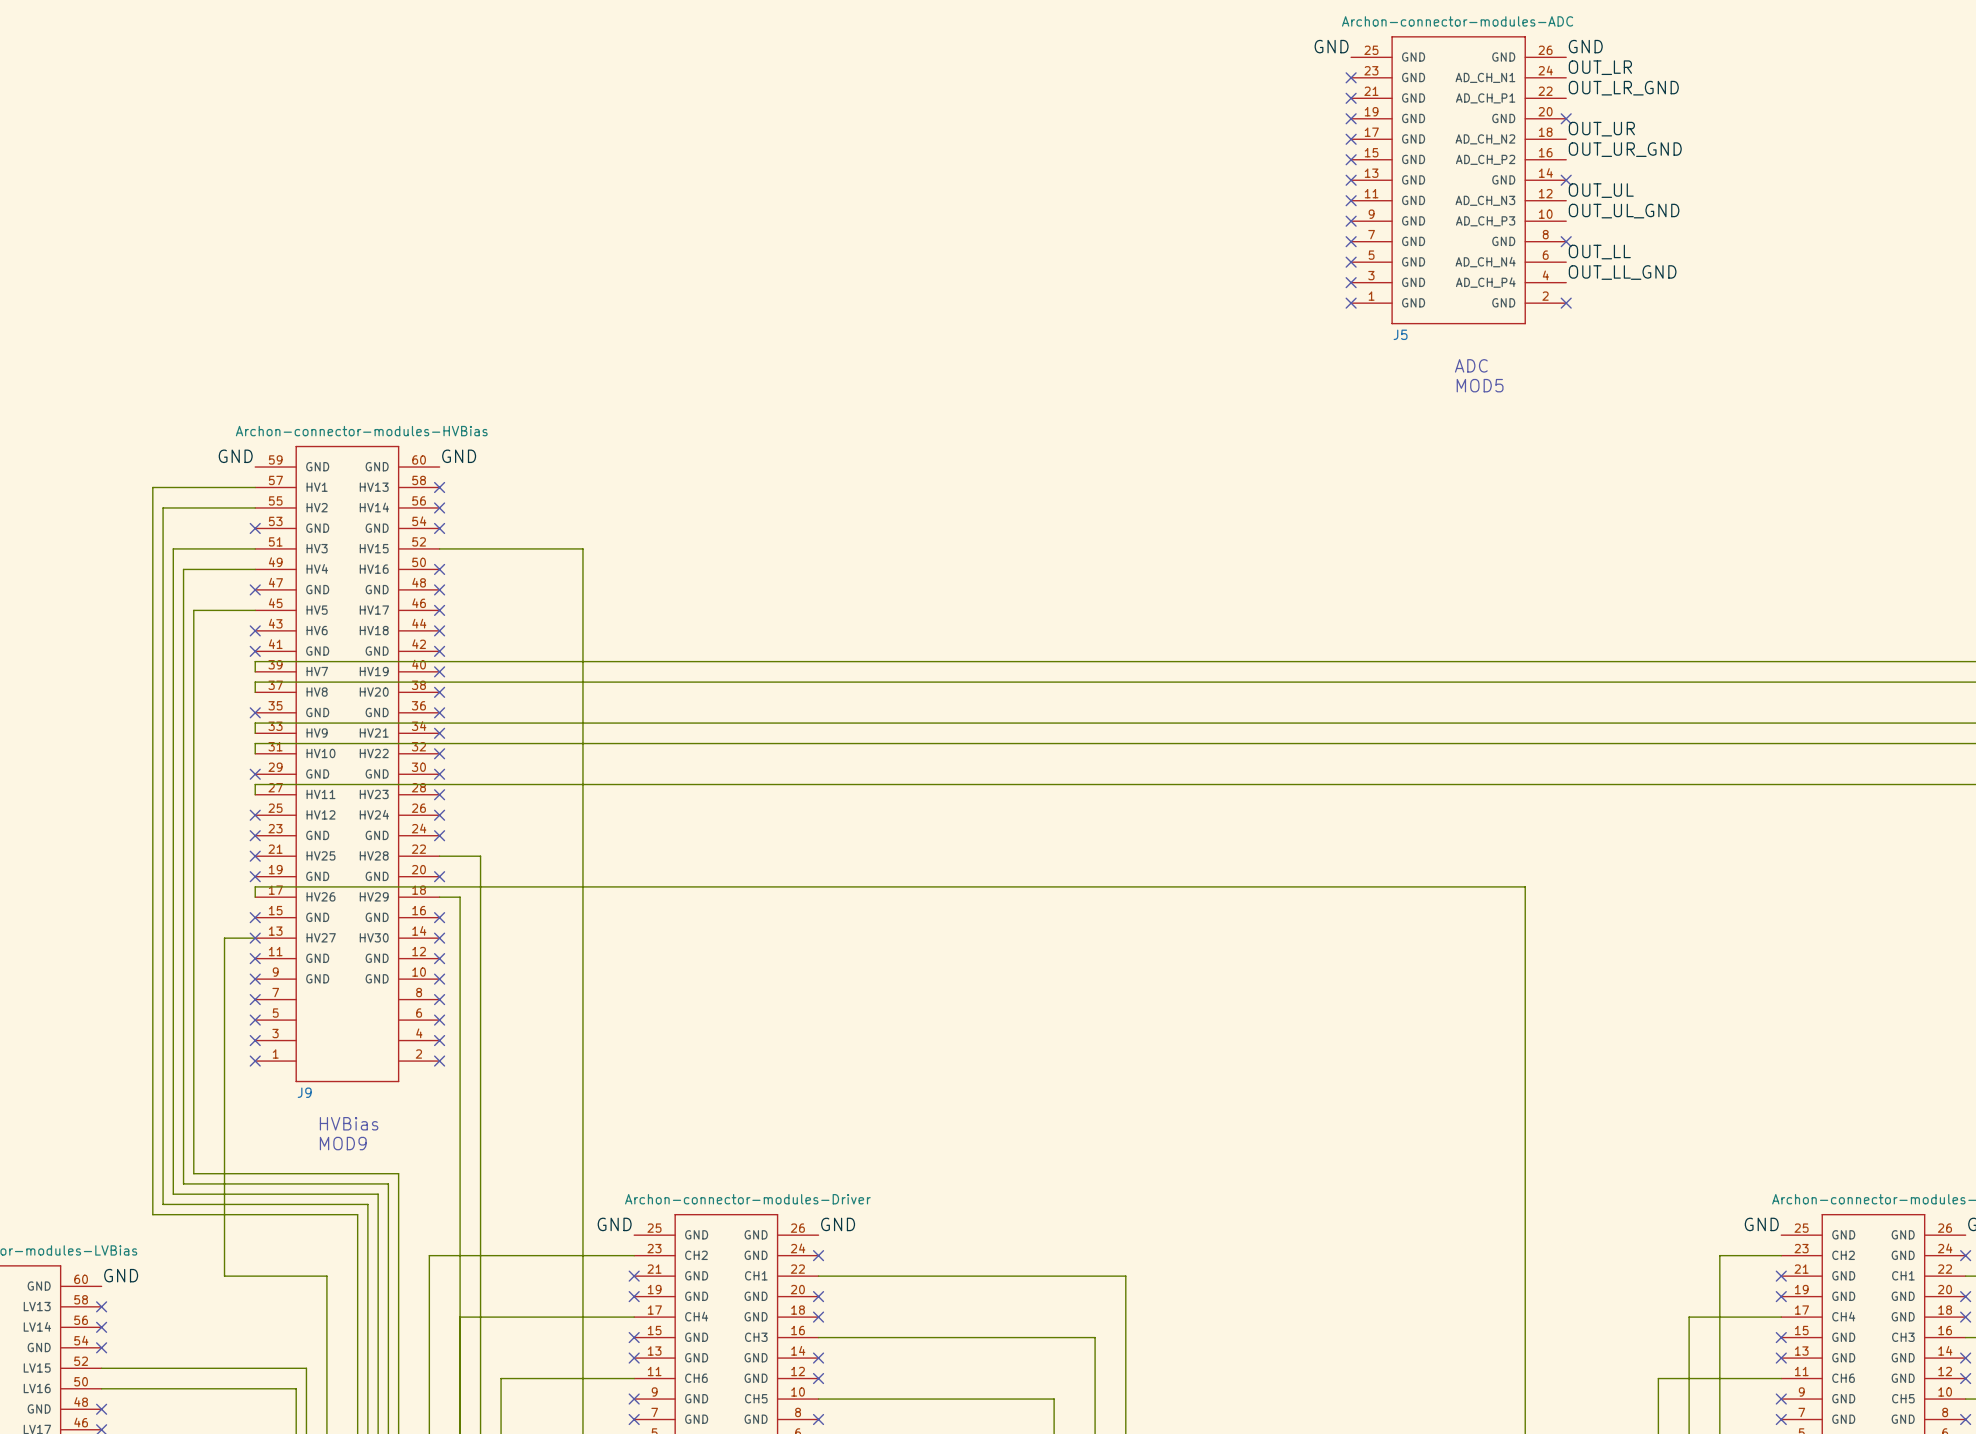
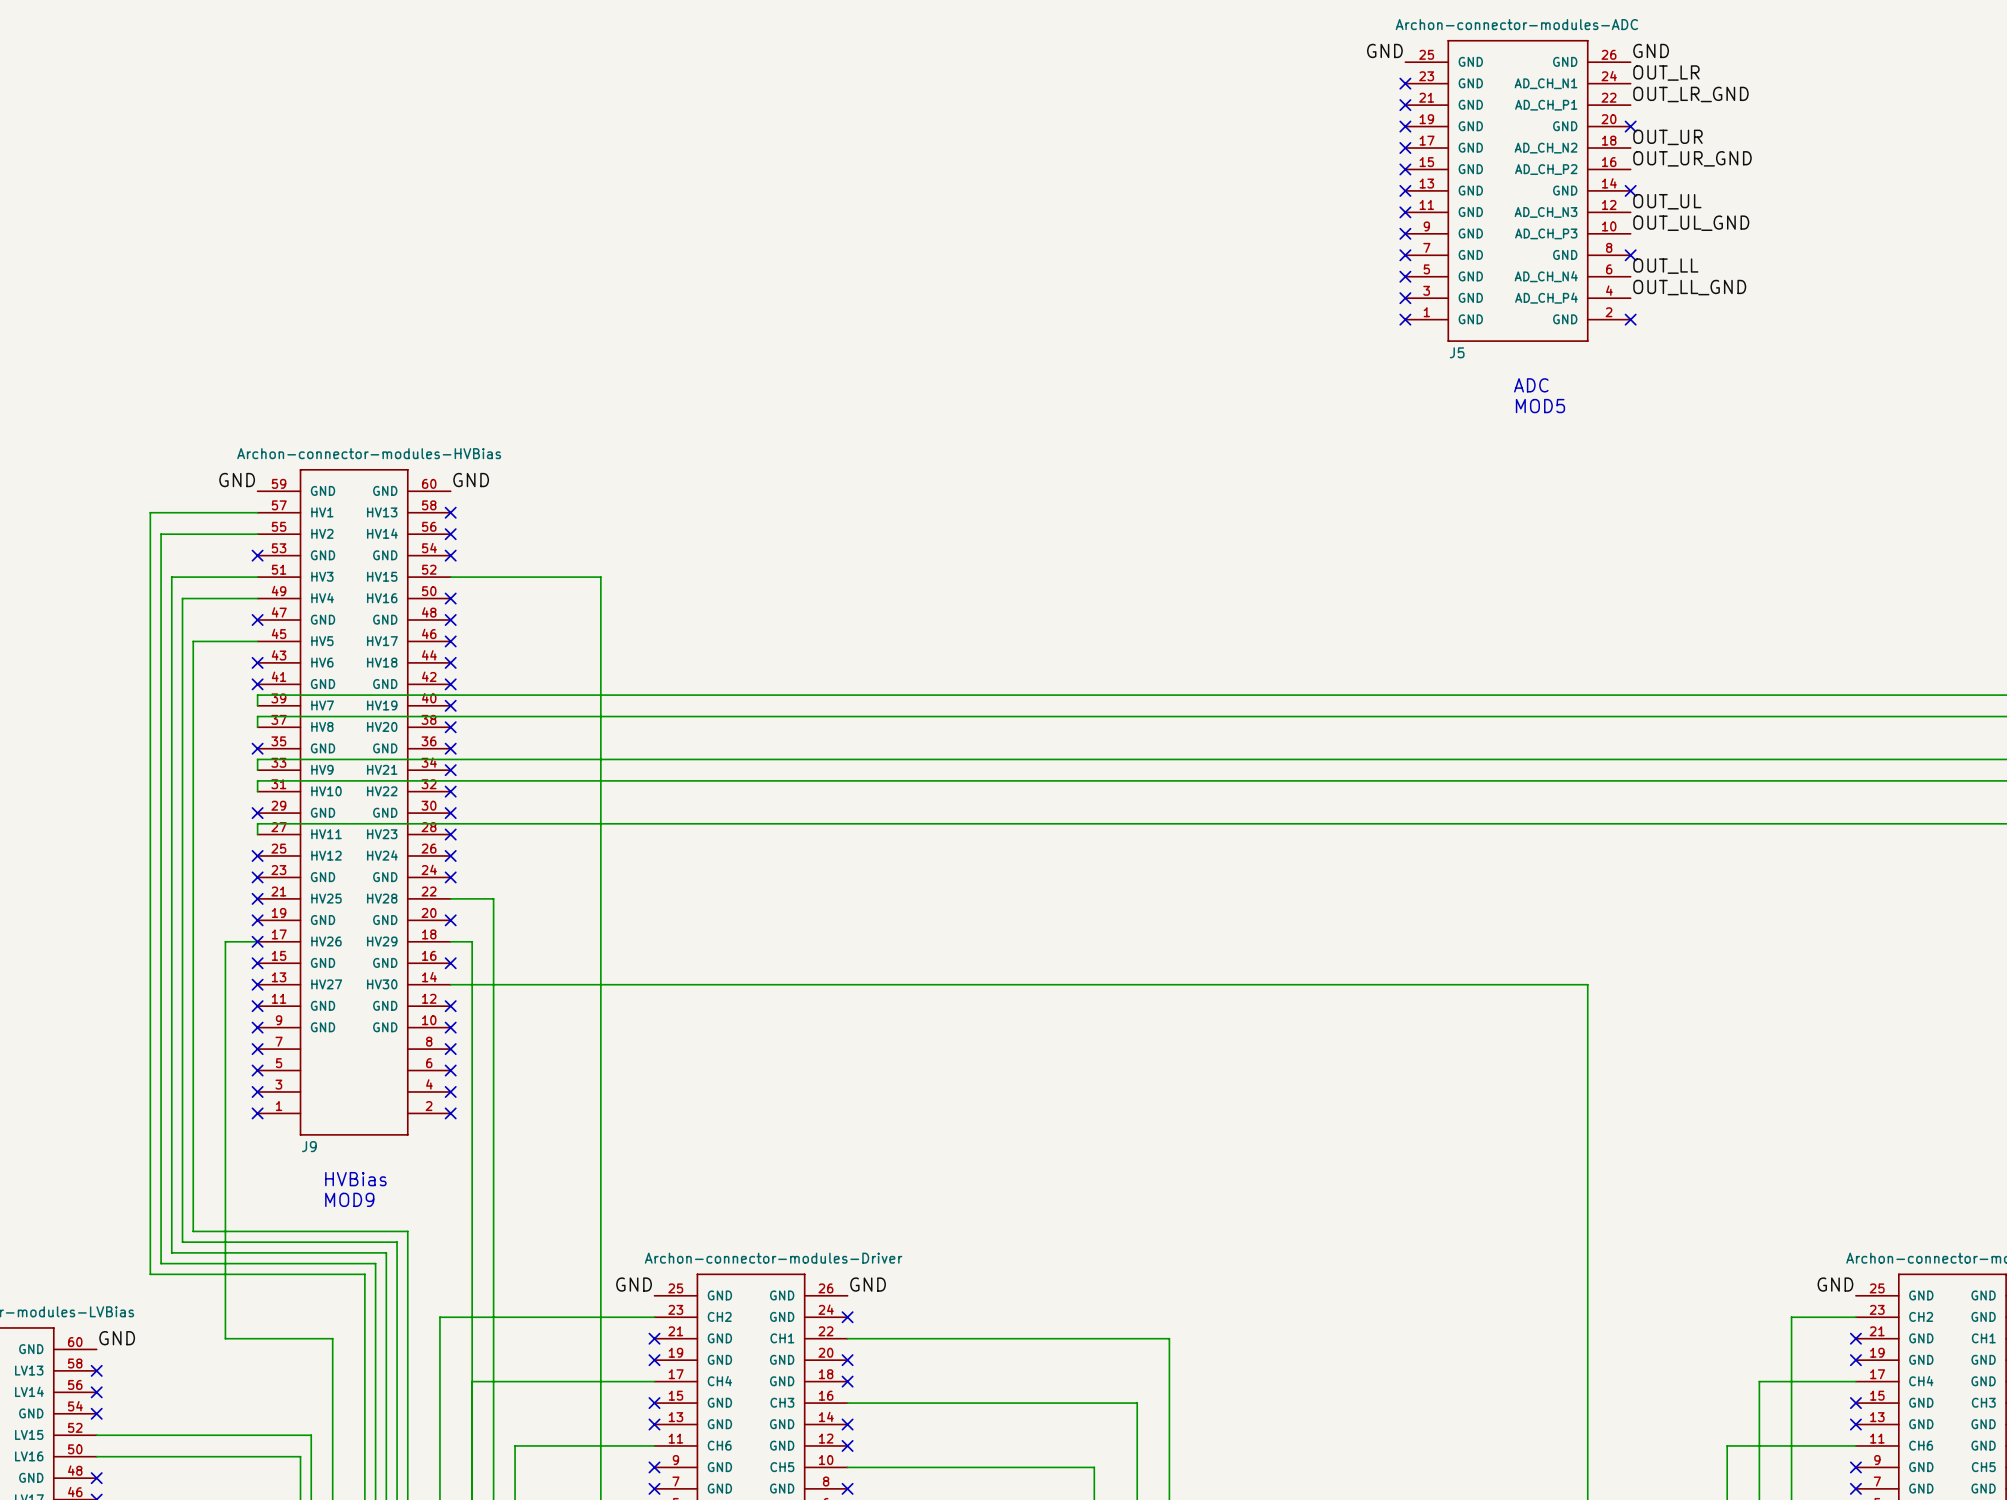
wire: (255, 897) (255, 886) (1525, 886) (1525, 938) -> (450, 984) (1587, 984)
no-connect mark: none -> (257, 941)
wire: (224, 938) (255, 938) -> (225, 984) (225, 941) (257, 941)
no-connect mark: (439, 938) -> none

